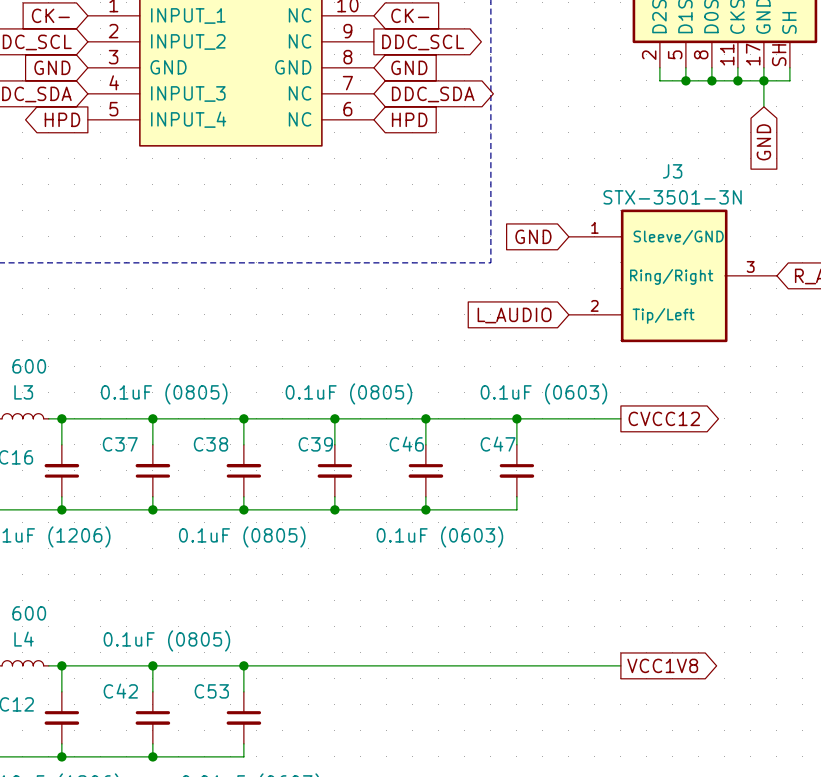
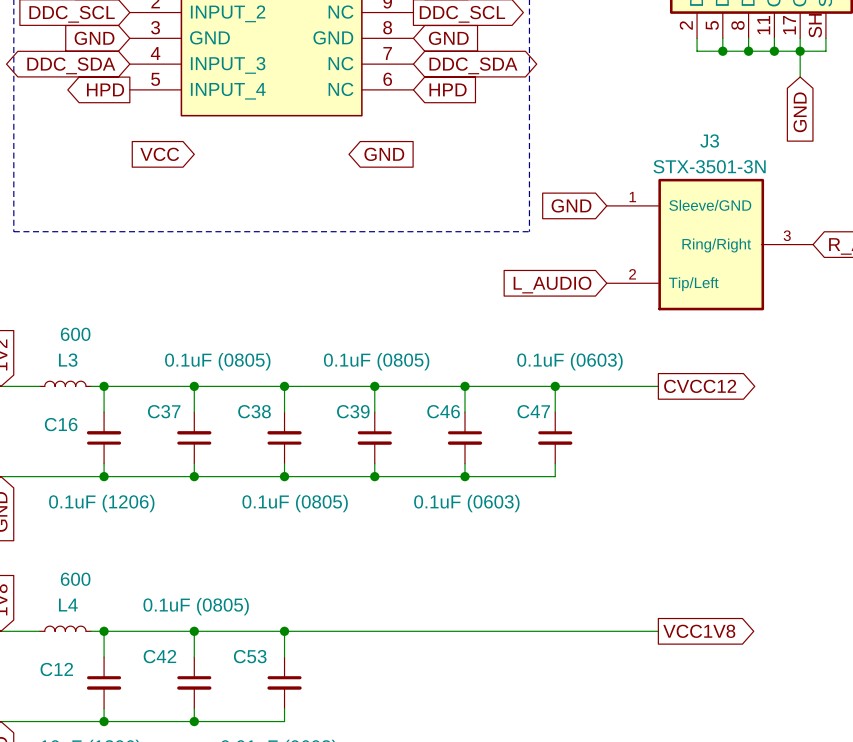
global label: none -> VCC (159, 154)
global label: none -> GND (384, 154)

